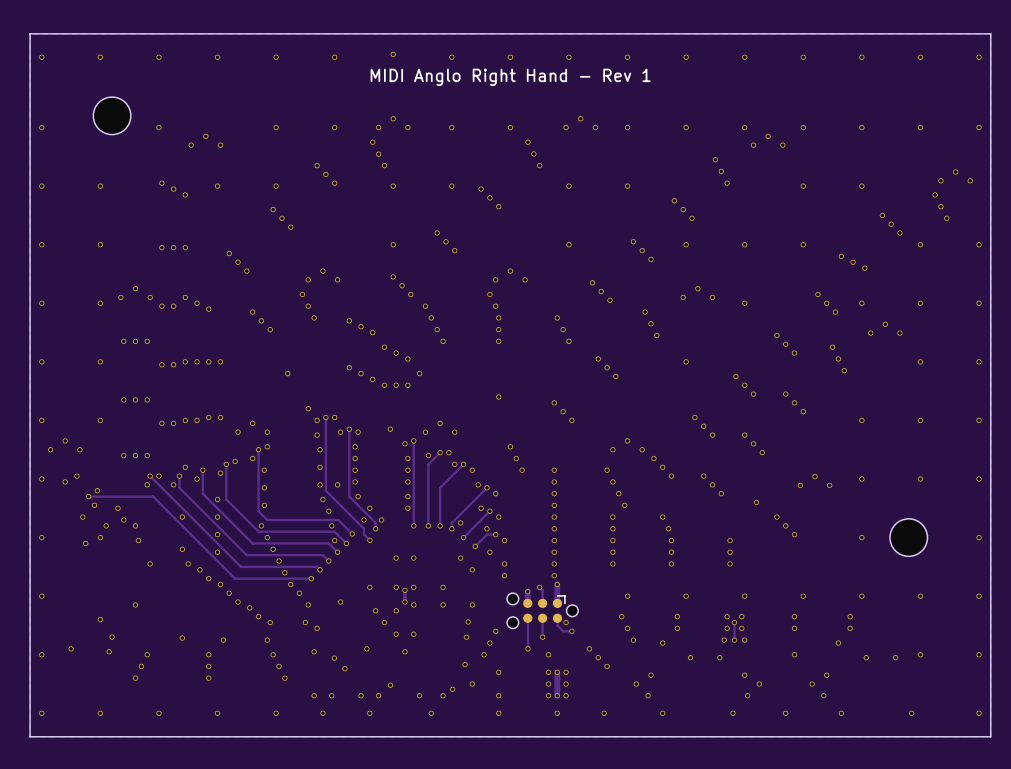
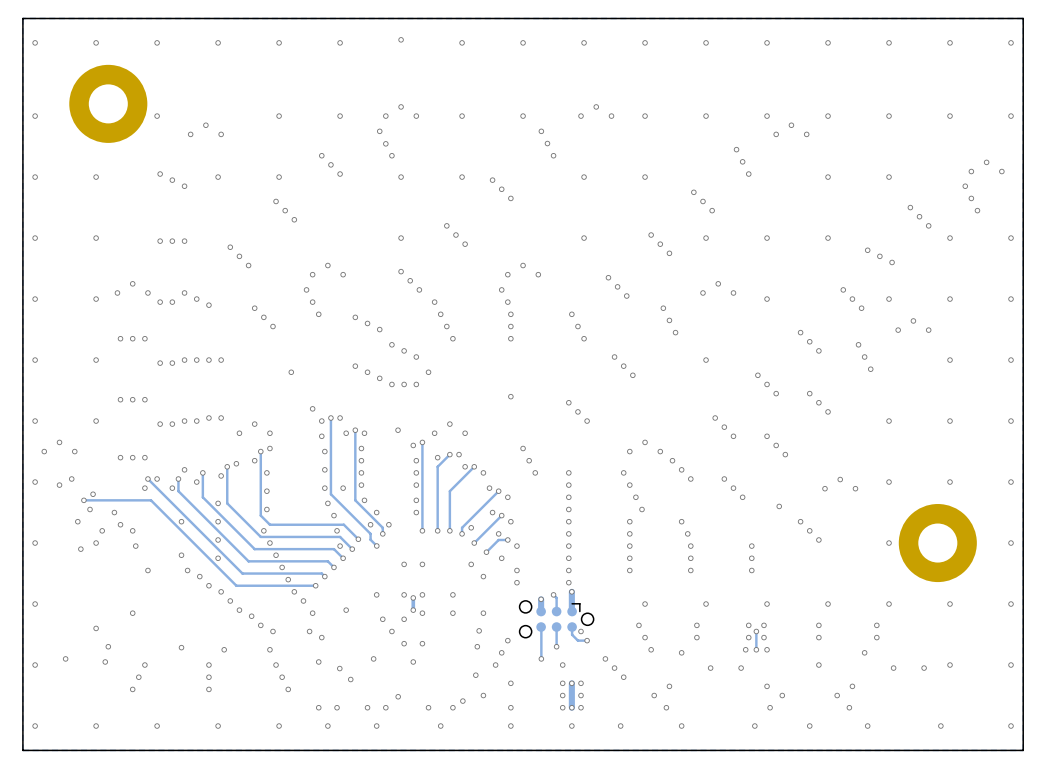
text: MIDI Anglo Right Hand - Rev 1 (510, 77) -> none
part footprint: [93, 97, 131, 135] -> [69, 64, 148, 143]
part footprint: [889, 518, 928, 557] -> [898, 504, 977, 583]

